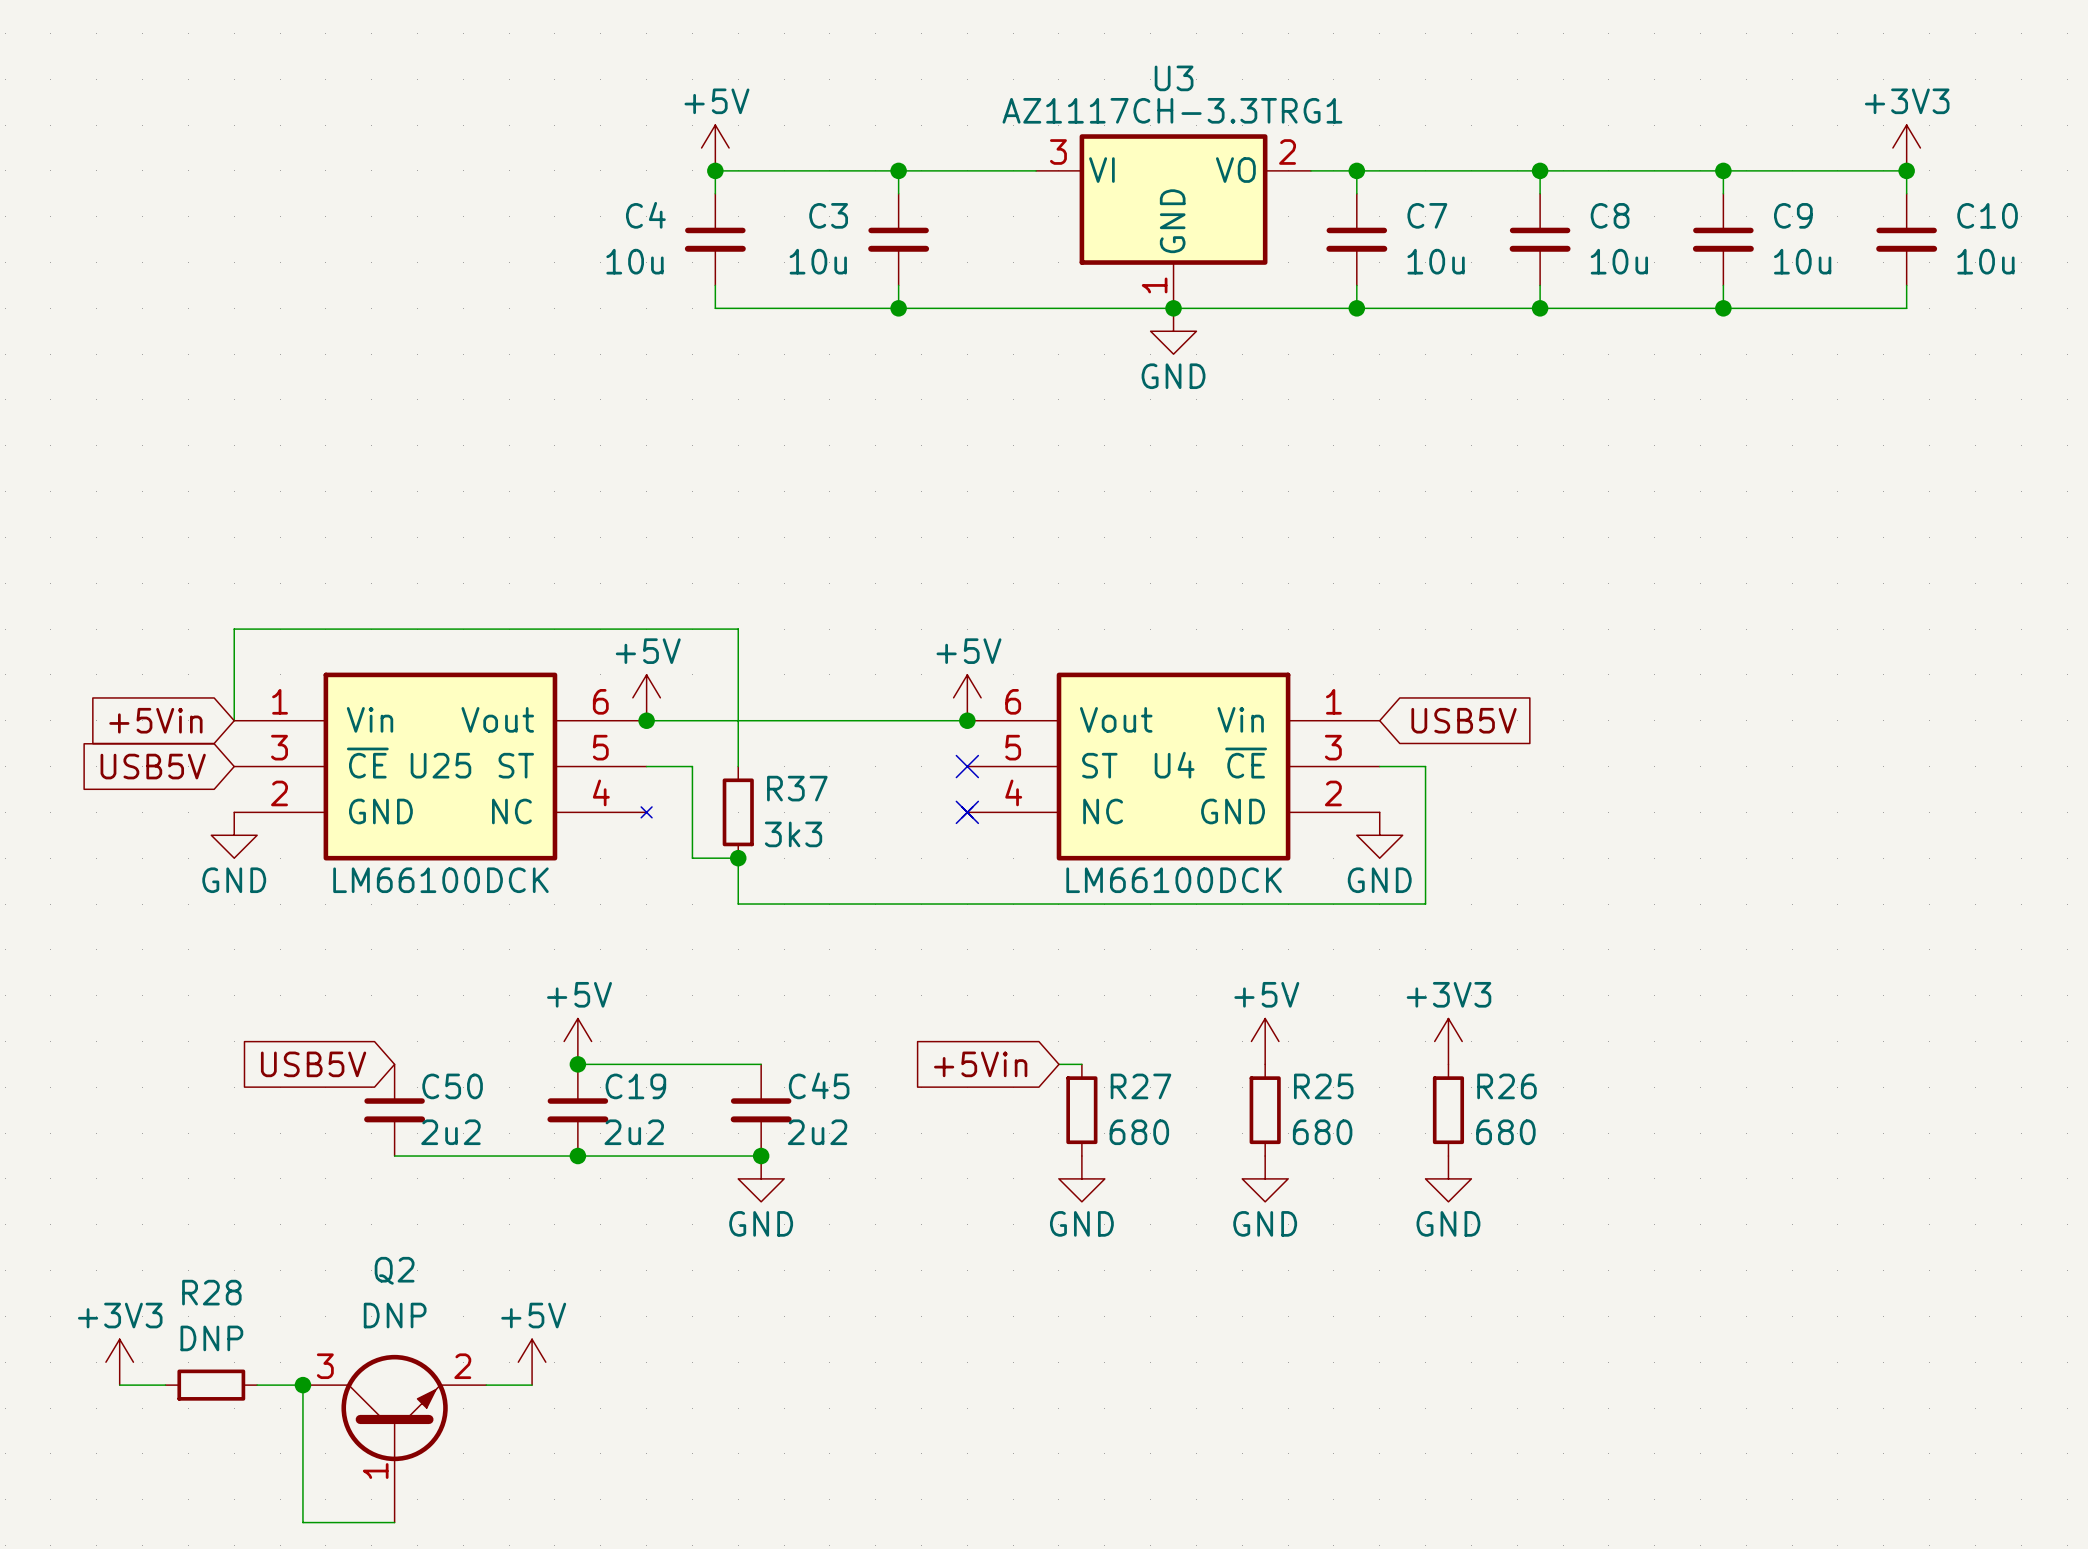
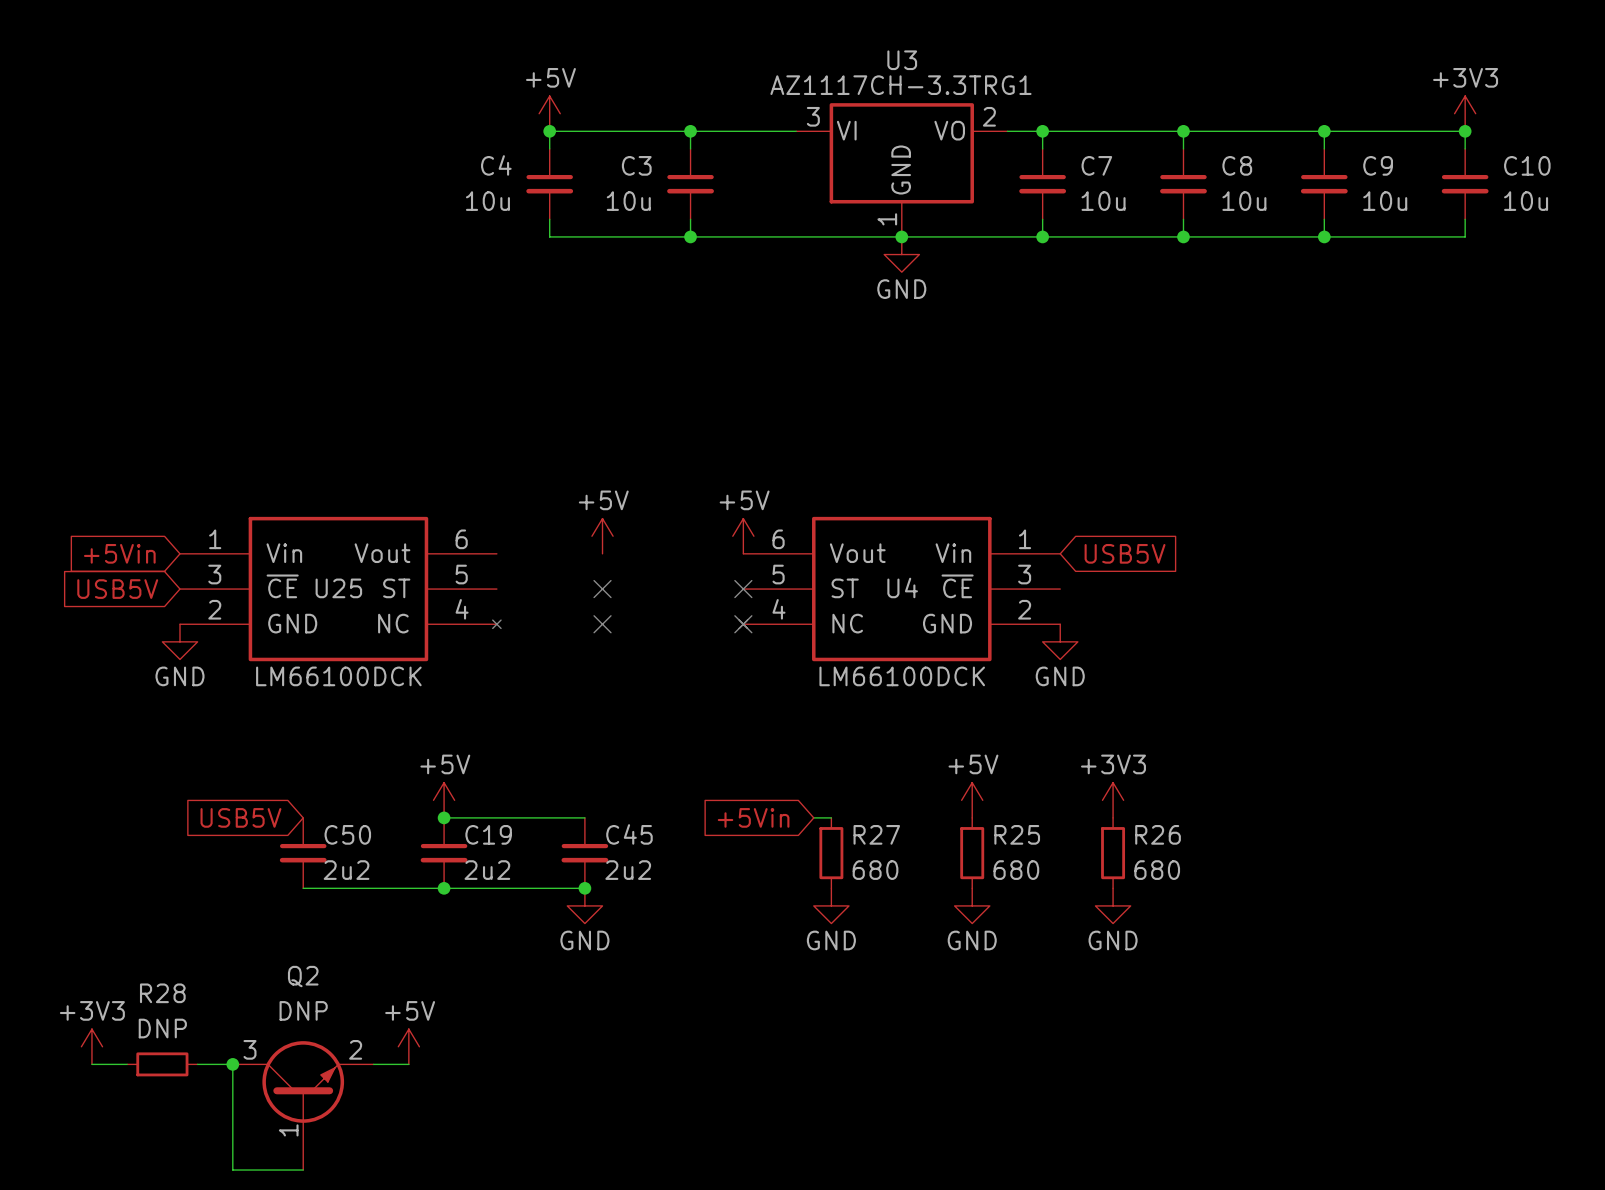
power symbol position: +5V (646, 697) -> +5V (602, 536)
wire: (234, 720) (234, 629) (738, 629) (738, 766) -> none
wire: (646, 720) (967, 720) -> none
junction: (646, 720) -> none
junction: (967, 720) -> none
wire: (646, 766) (692, 766) (692, 858) (738, 858) (738, 904) (1425, 904) (1425, 766) (1379, 766) -> none
no-connect mark: none -> (602, 589)
R37: 3k3 (738, 812) -> none
no-connect mark: none -> (602, 624)
junction: (738, 858) -> none

